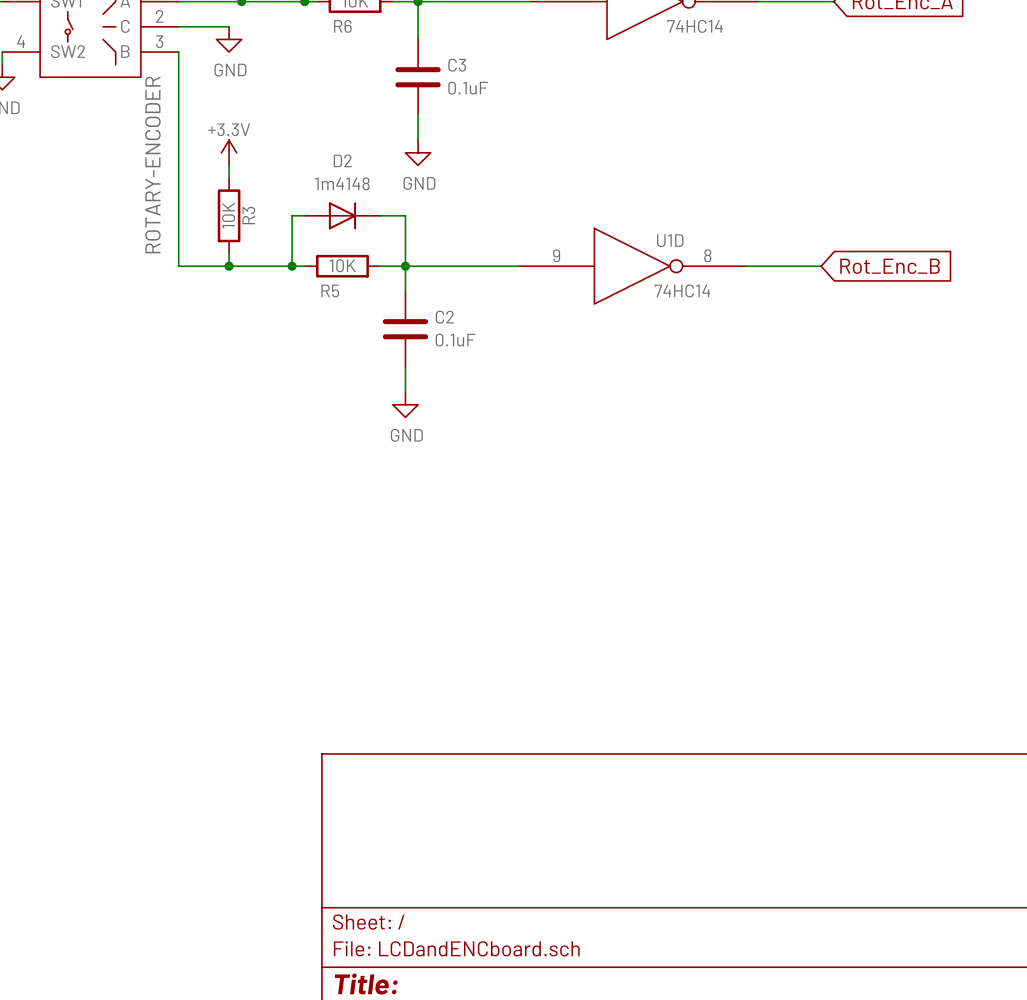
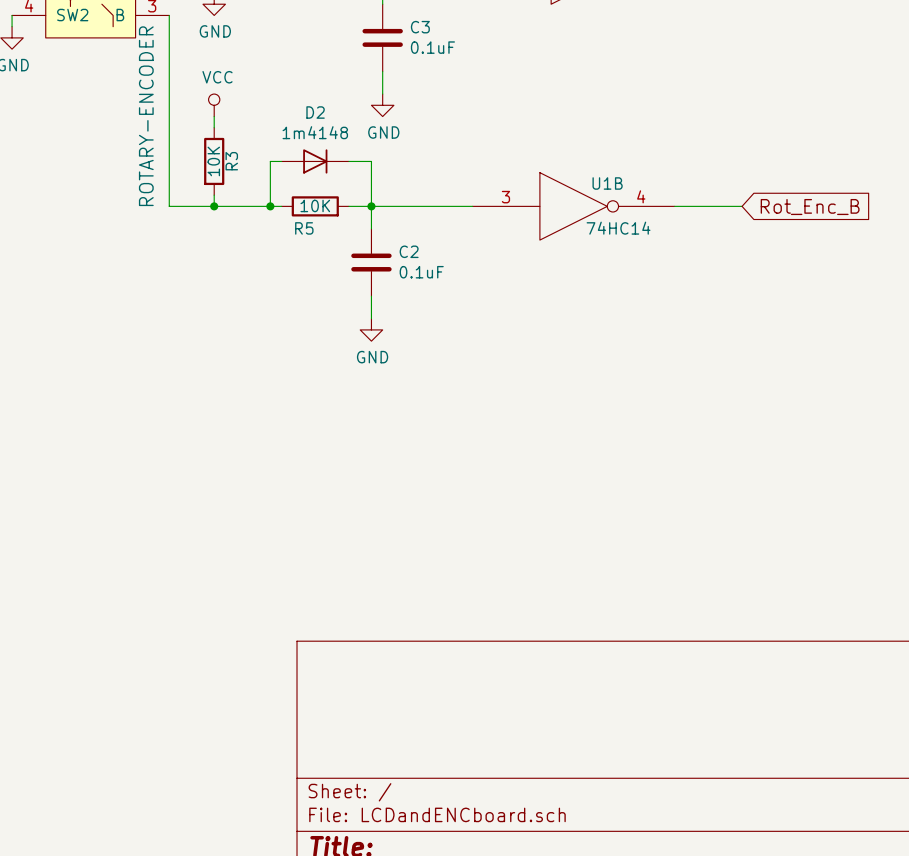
power symbol: +3.3V (229, 152) -> VCC (214, 105)
U1D name: U1D (670, 240) -> U1B (607, 183)
U1D pin number: 9 (556, 255) -> 3 (505, 197)
U1D pin number: 8 (707, 255) -> 4 (641, 196)

